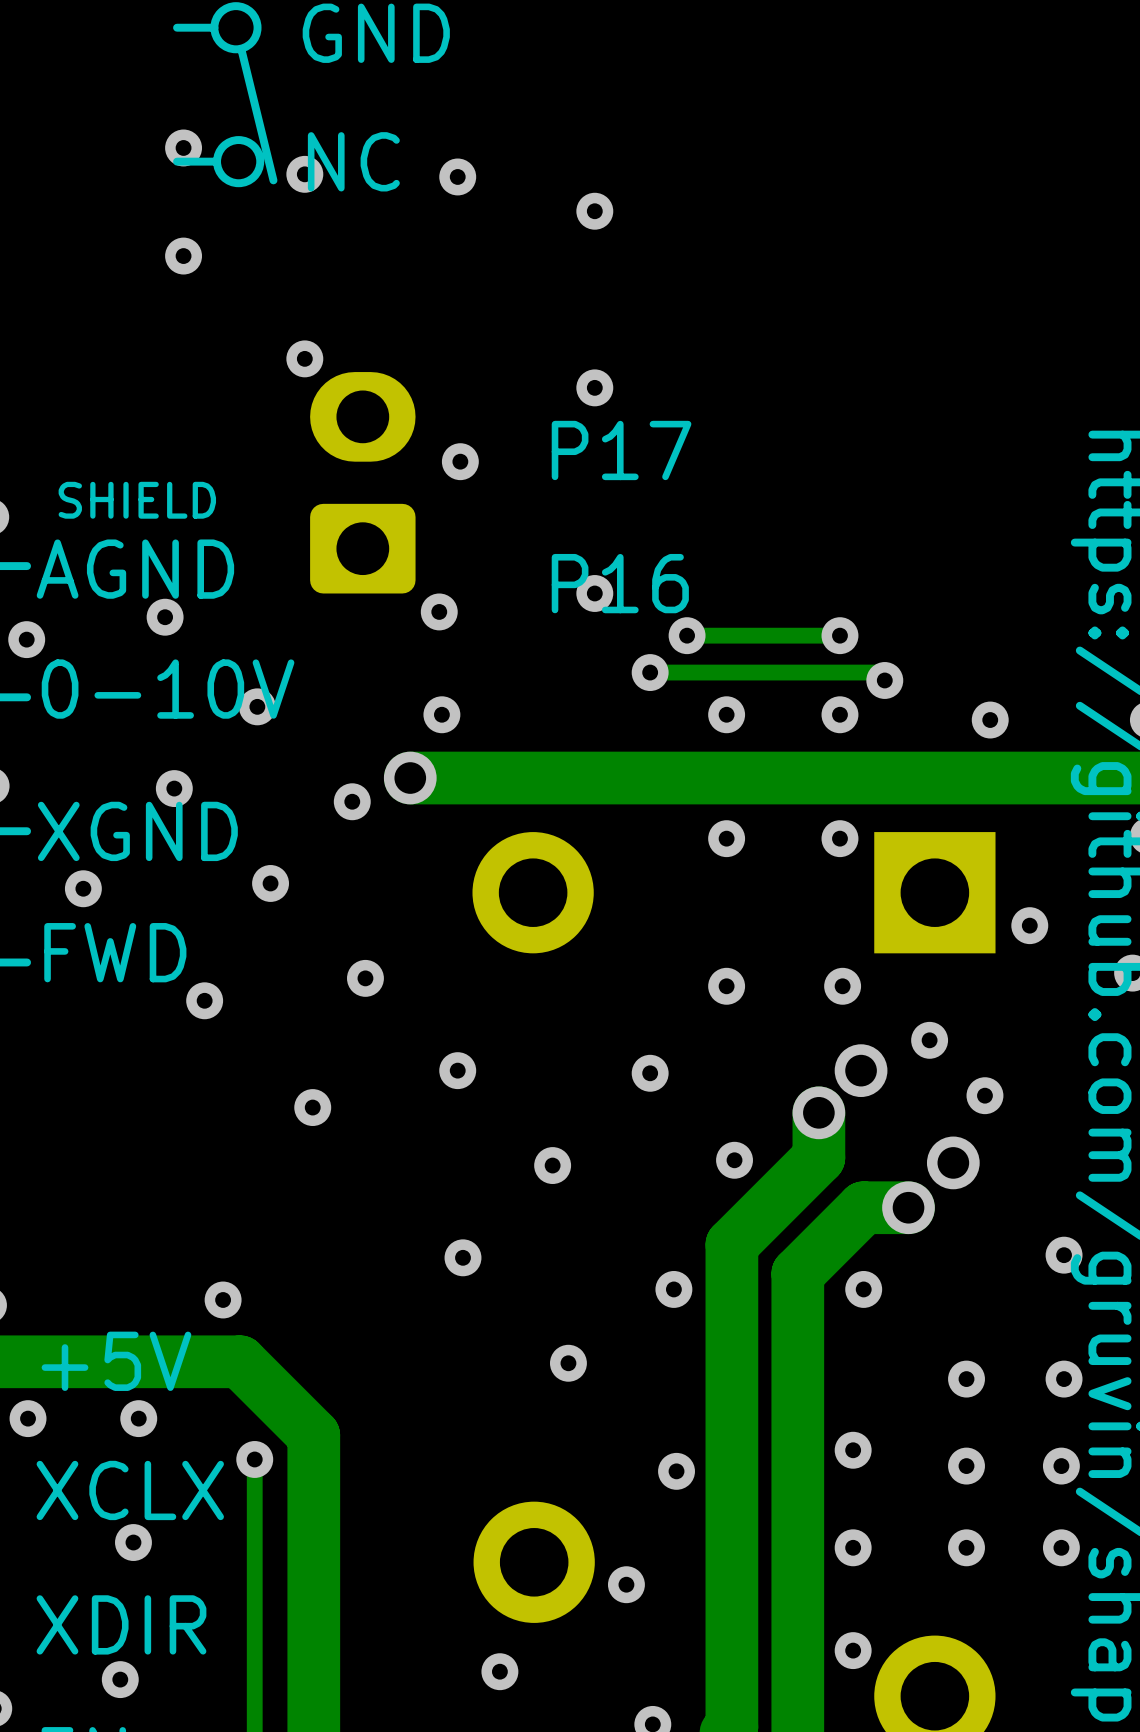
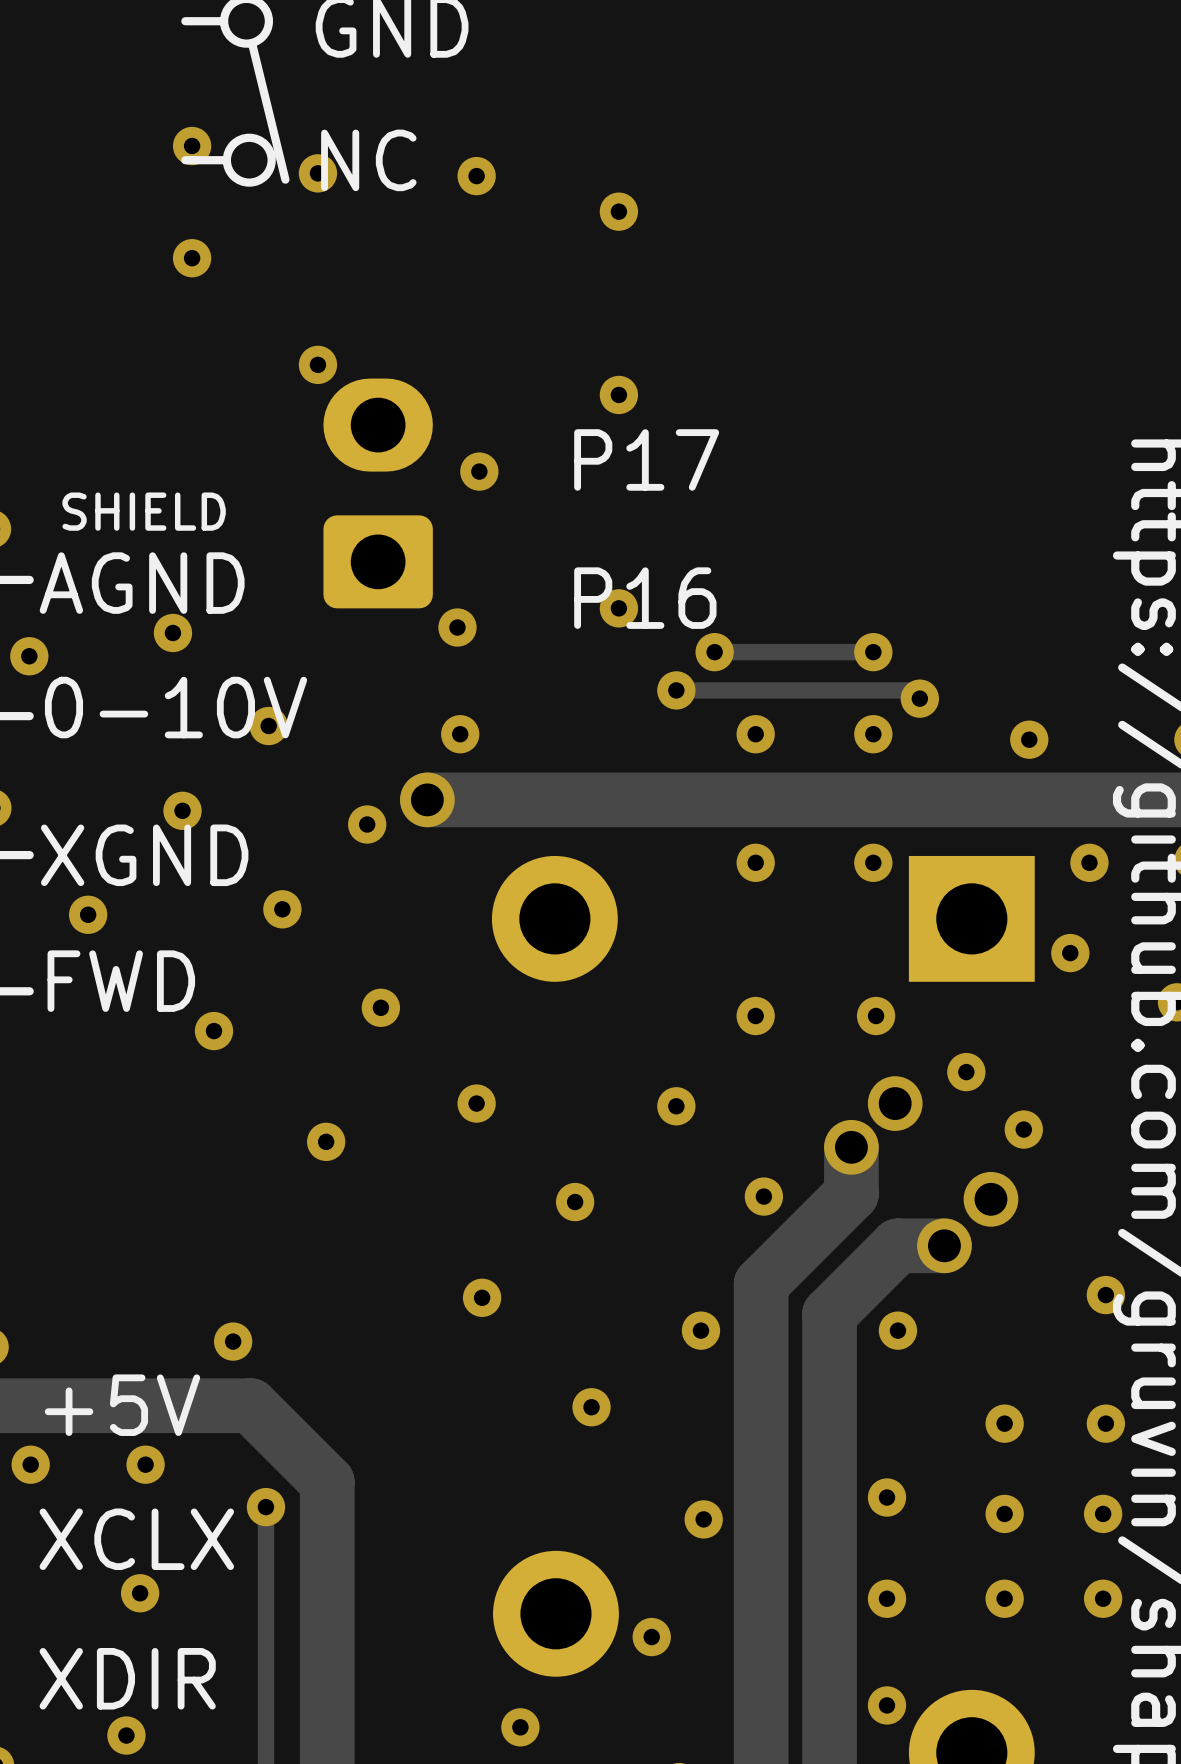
via: none -> (1089, 862)

